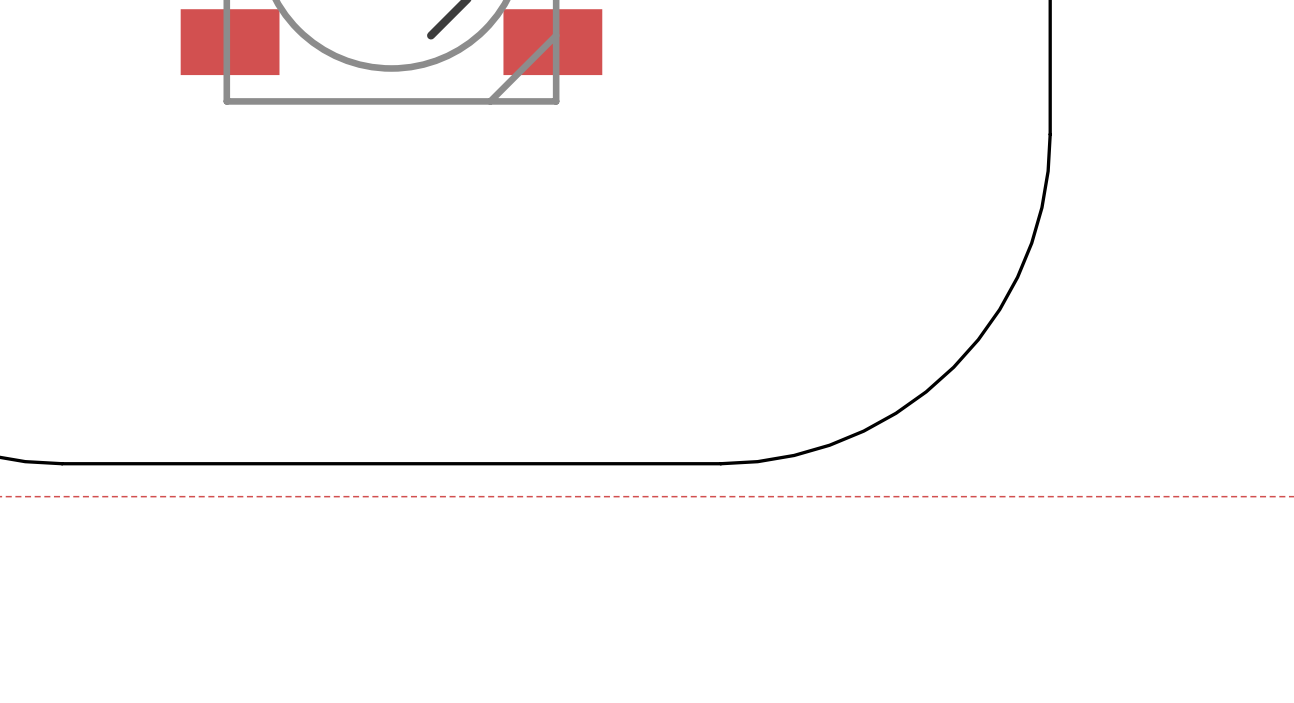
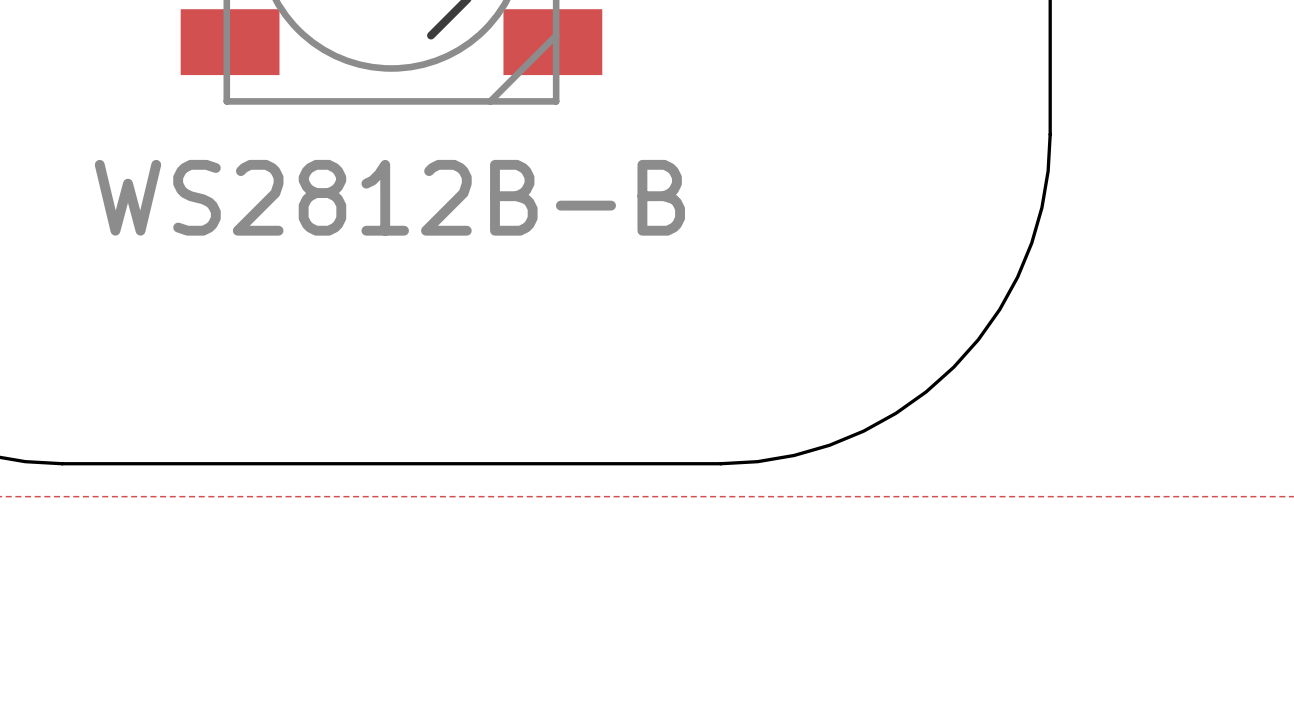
part value: none -> WS2812B-B (389, 197)

